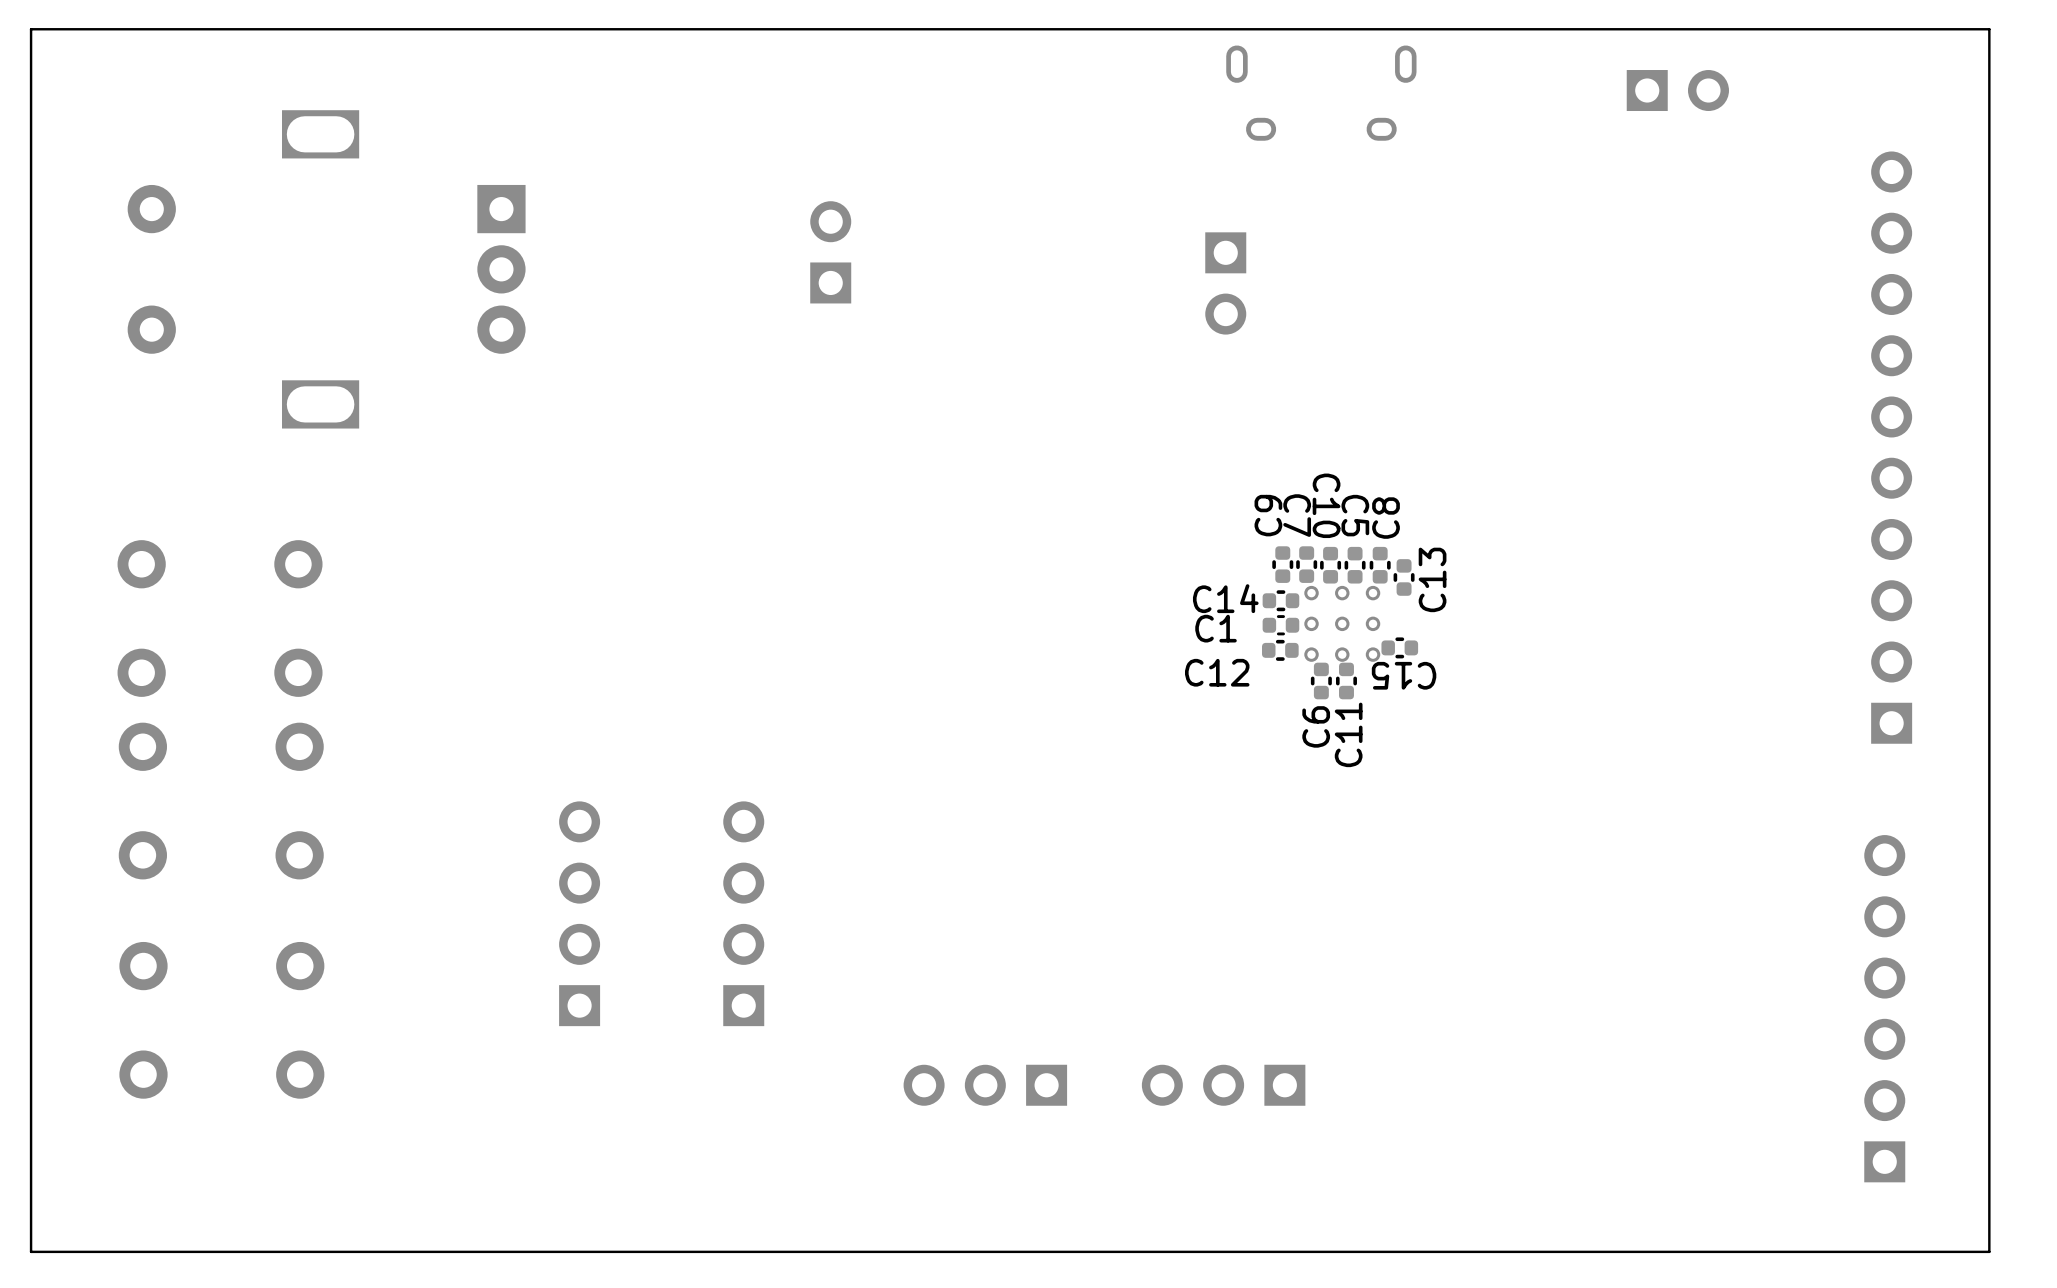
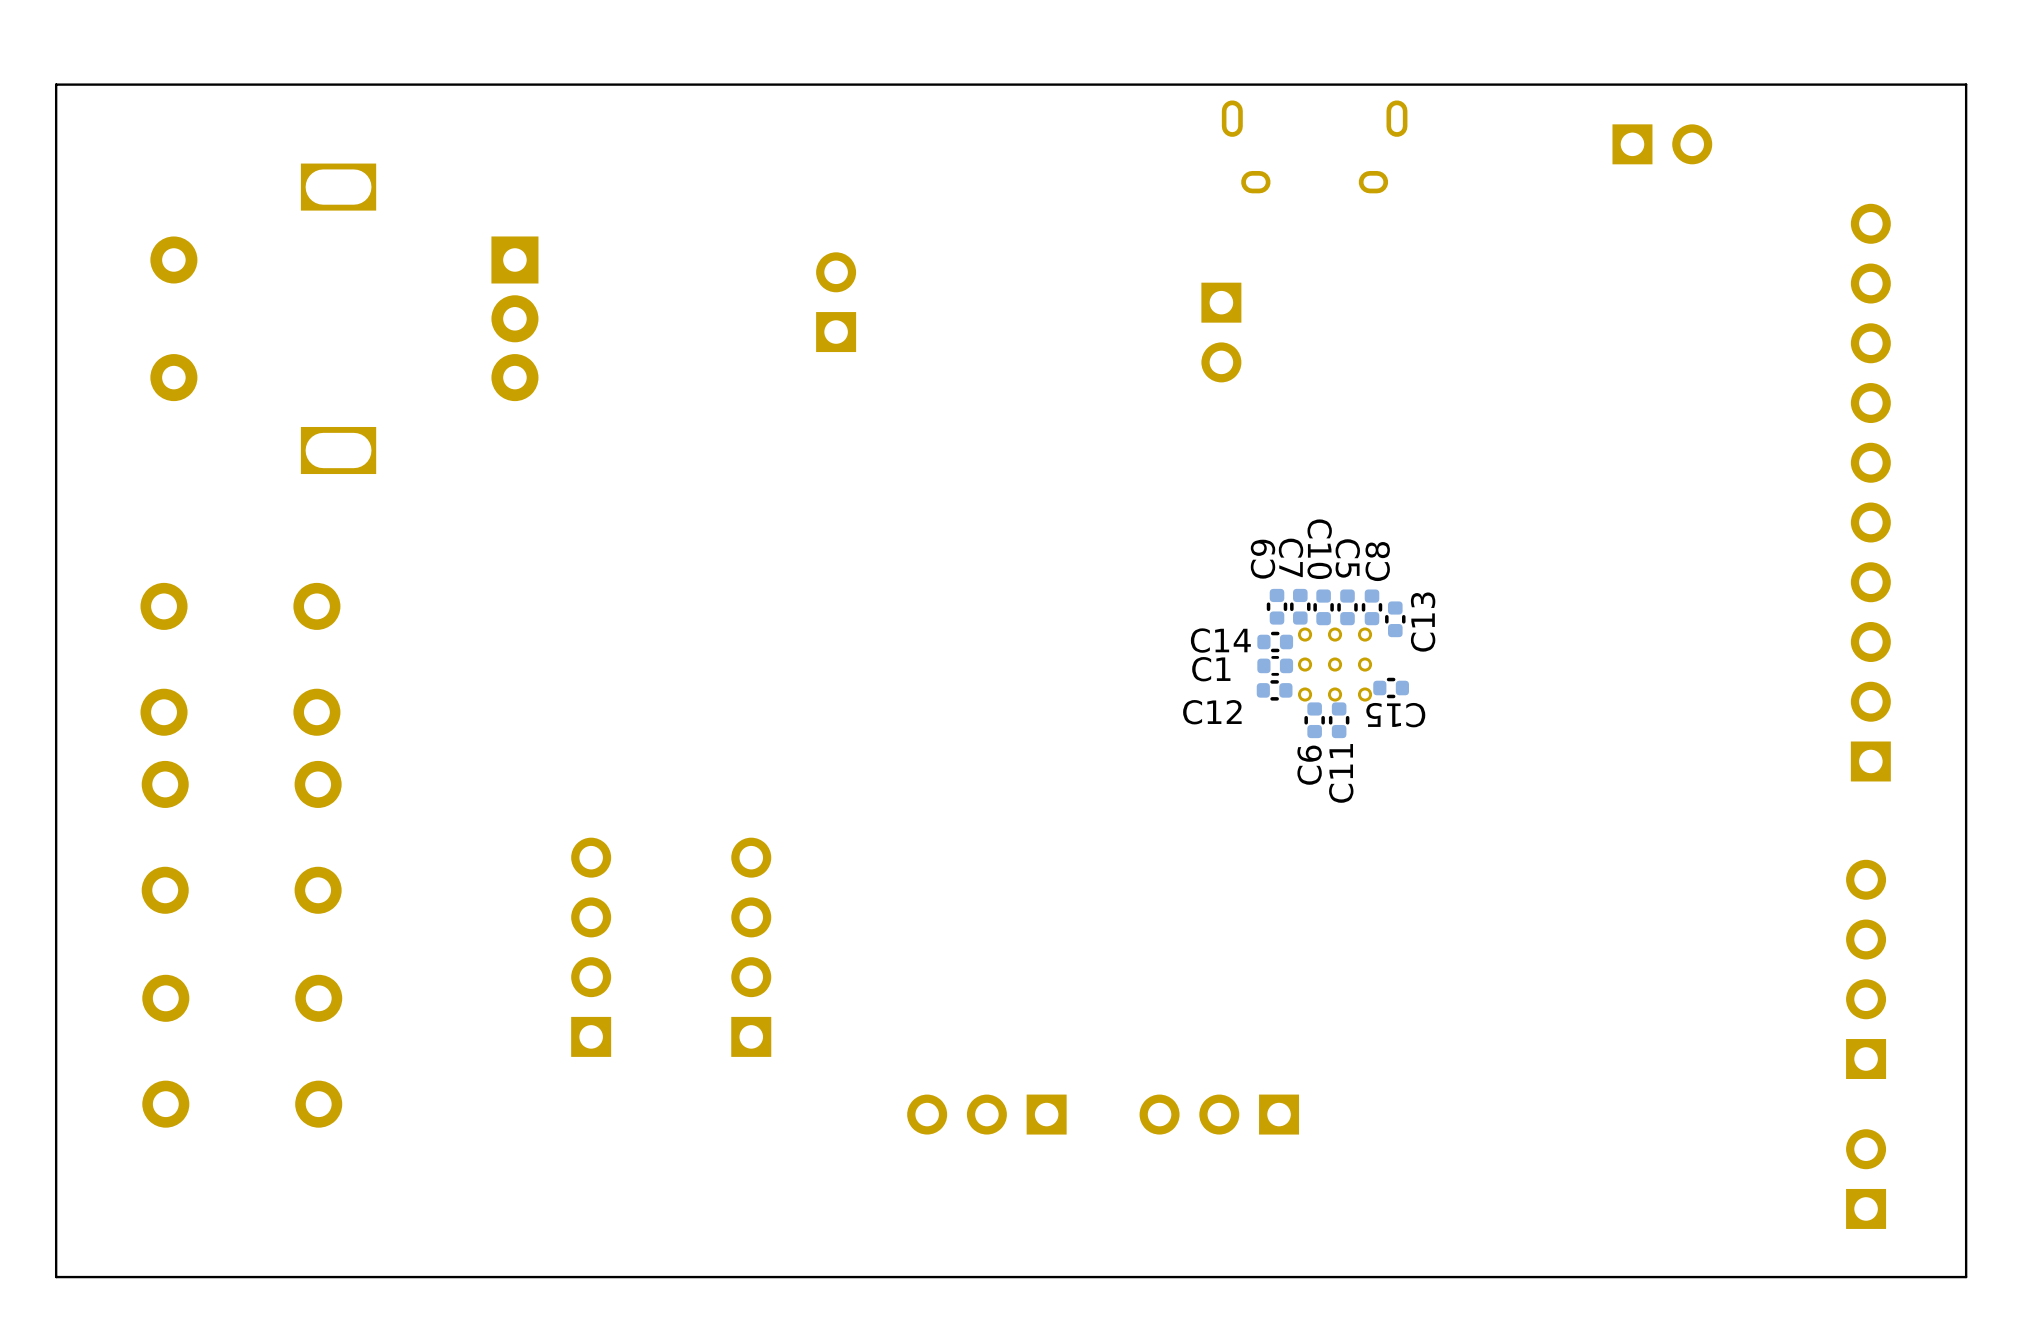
part: none -> (1866, 969)
part: (1884, 1008) -> none
part: none -> (1866, 1179)

